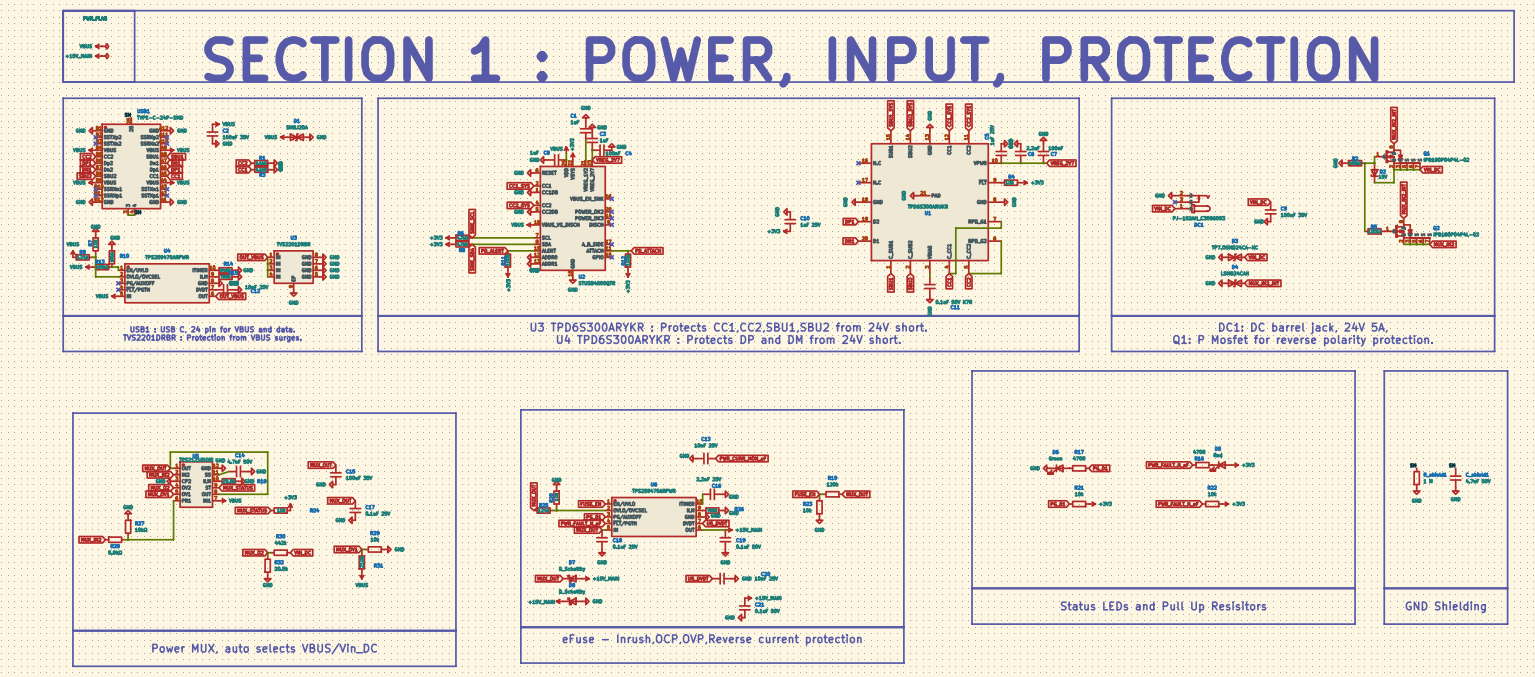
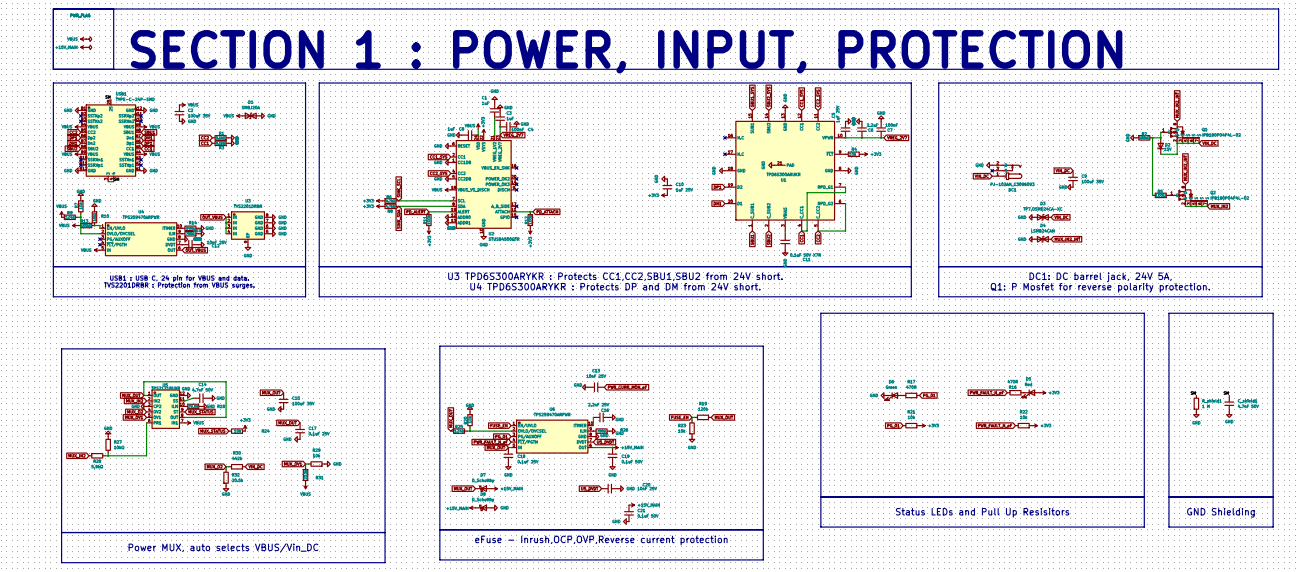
text position: SECTION 1 : POWER, INPUT, PROTECTION (791, 61) -> SECTION 1 : POWER, INPUT, PROTECTION (626, 51)

